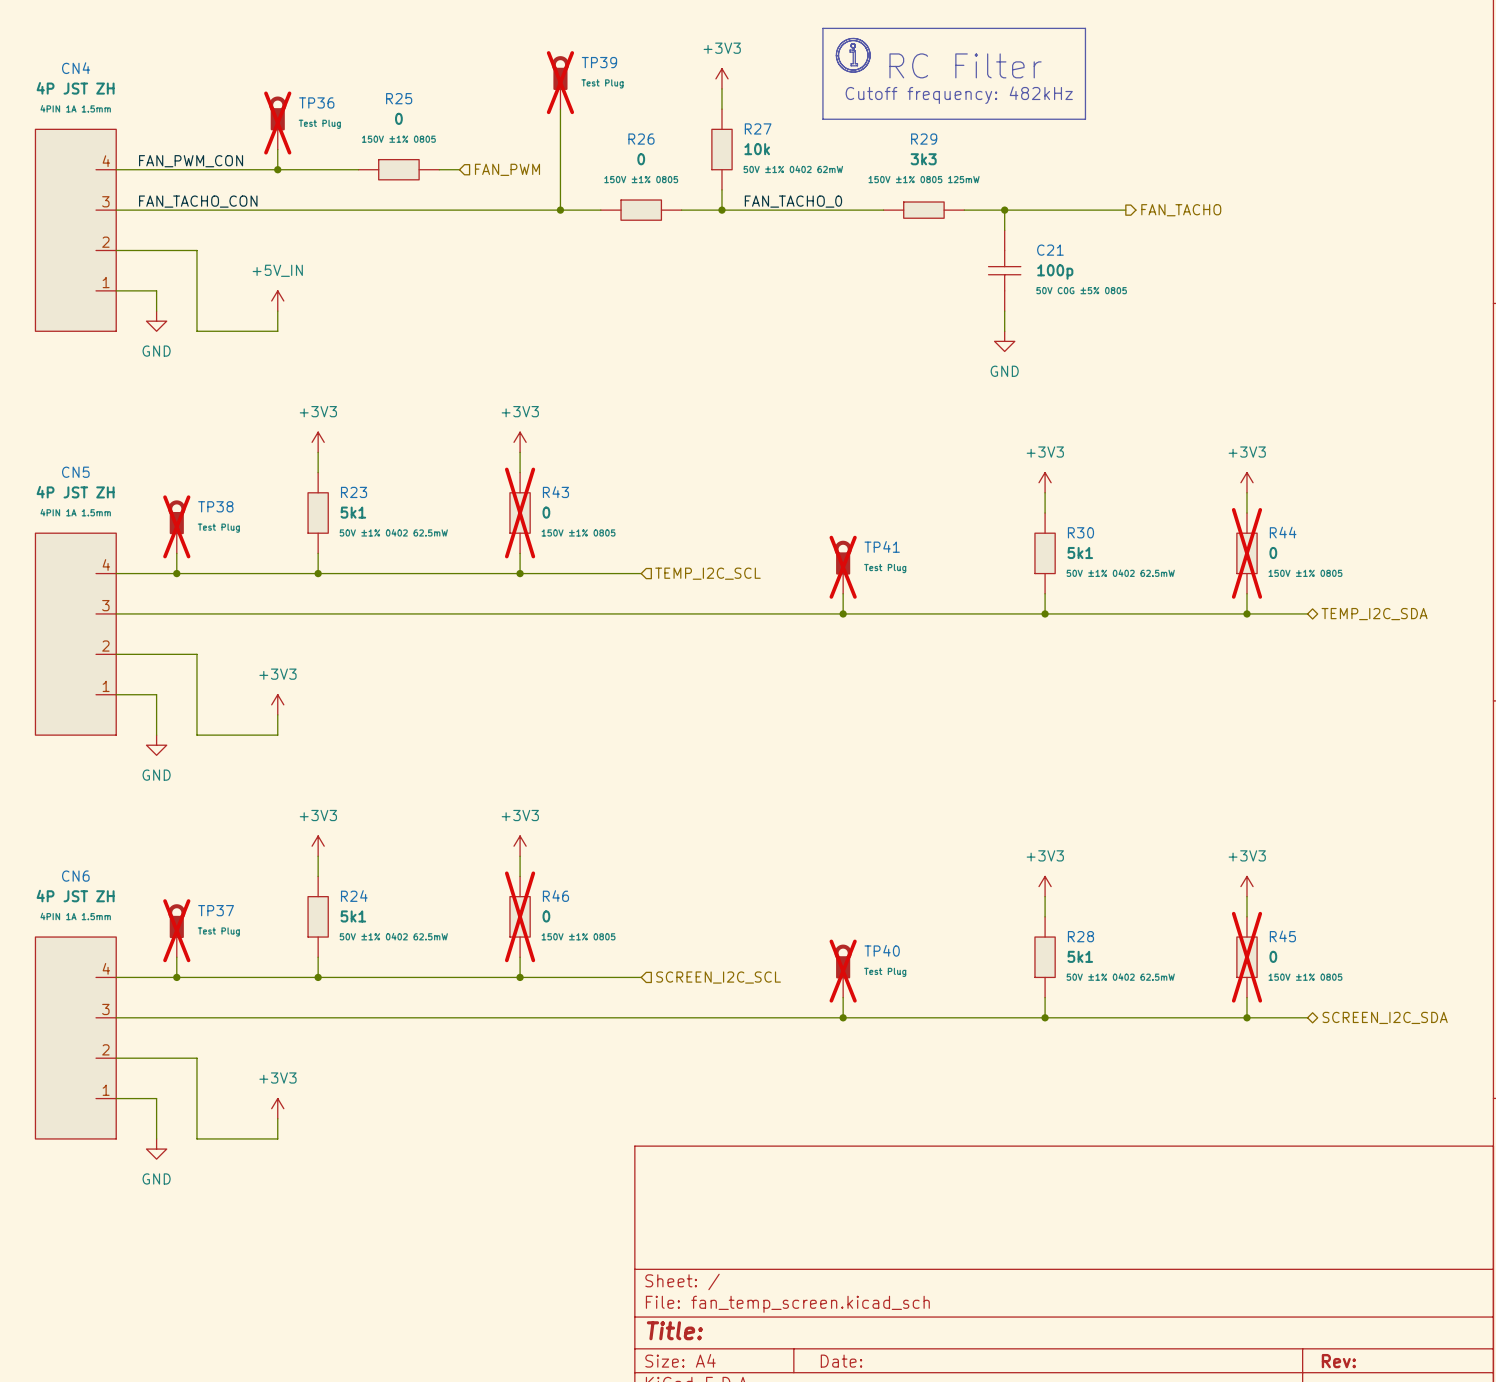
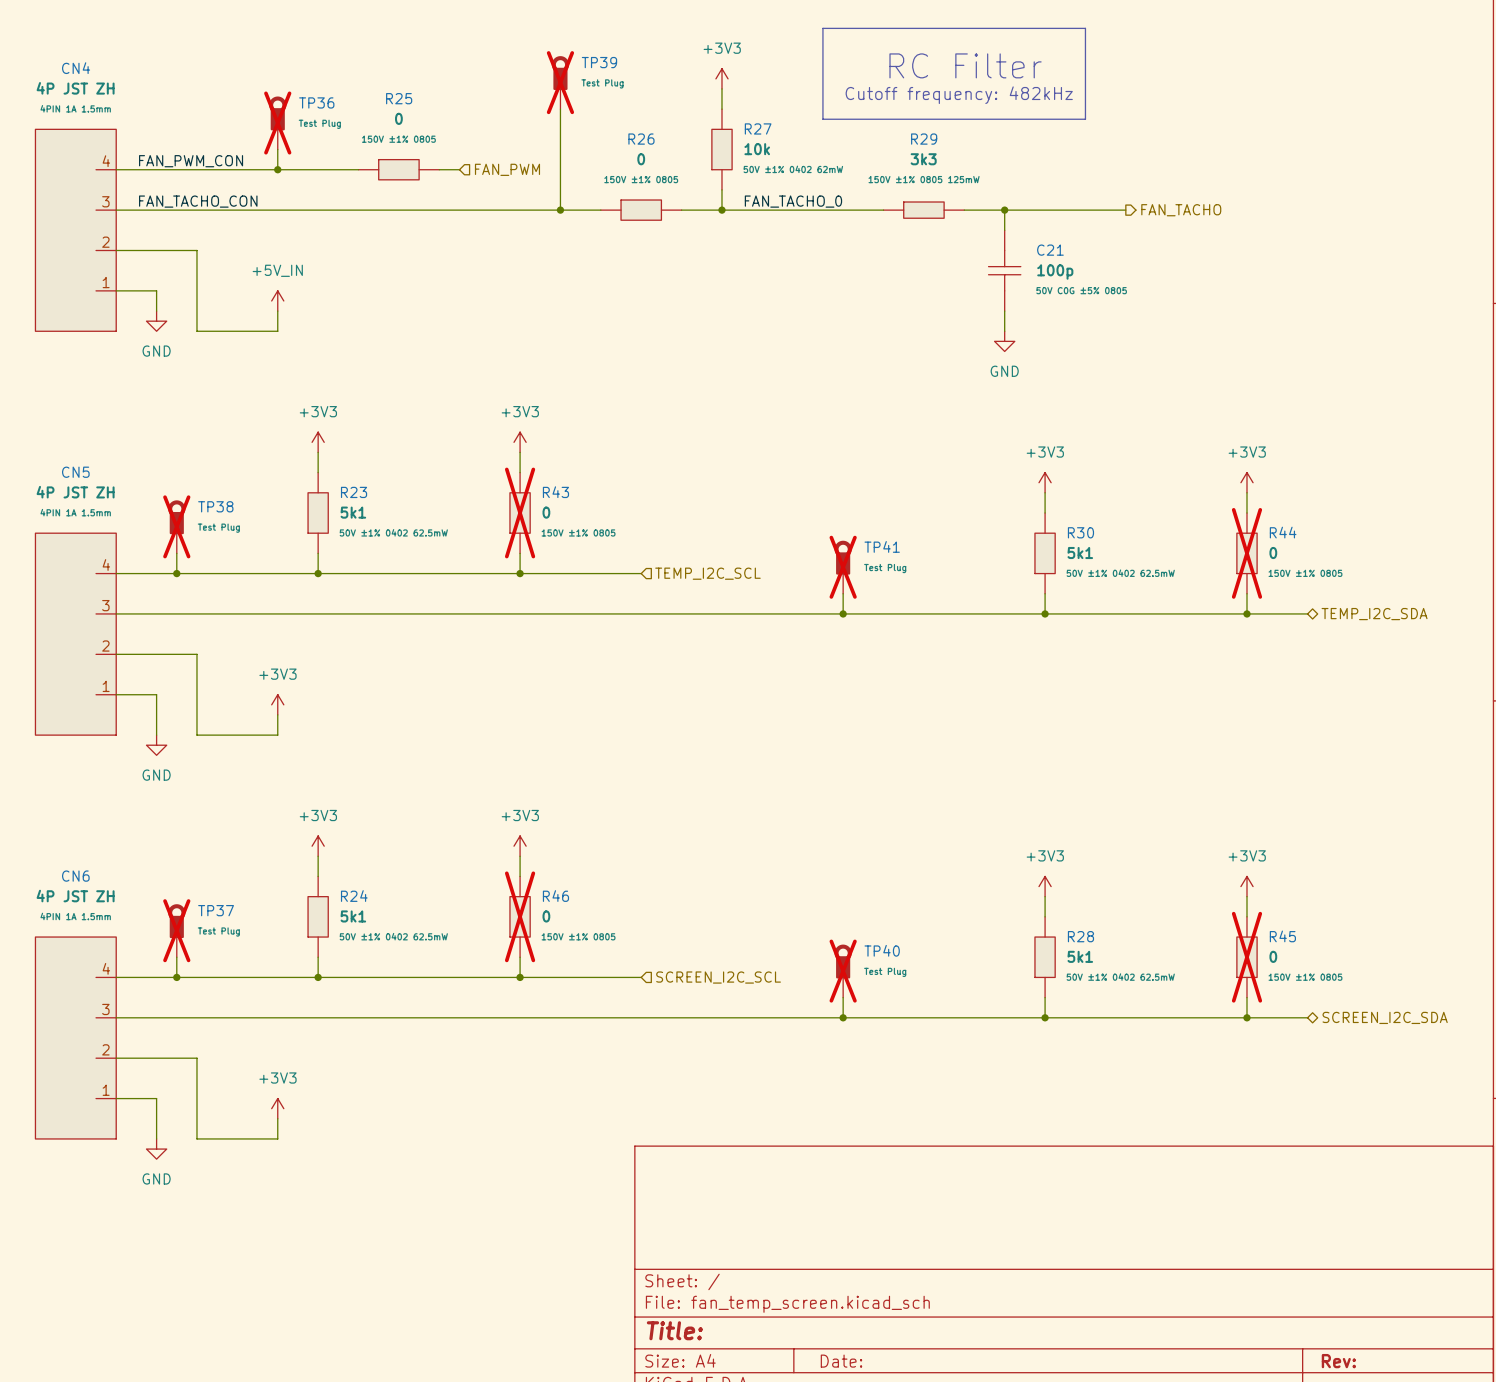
line: (853, 38) (841, 43) (836, 54) (841, 67) (853, 72) (865, 67) (870, 55) (865, 43) (853, 38) -> none
line: (853, 50) (850, 50) (850, 52) (853, 52) (853, 63) (851, 65) (857, 65) (855, 63) (855, 52) -> none
line: (838, 55) (843, 66) (853, 70) (864, 65) (867, 54) (863, 44) (852, 40) (842, 44) (838, 55) -> none

